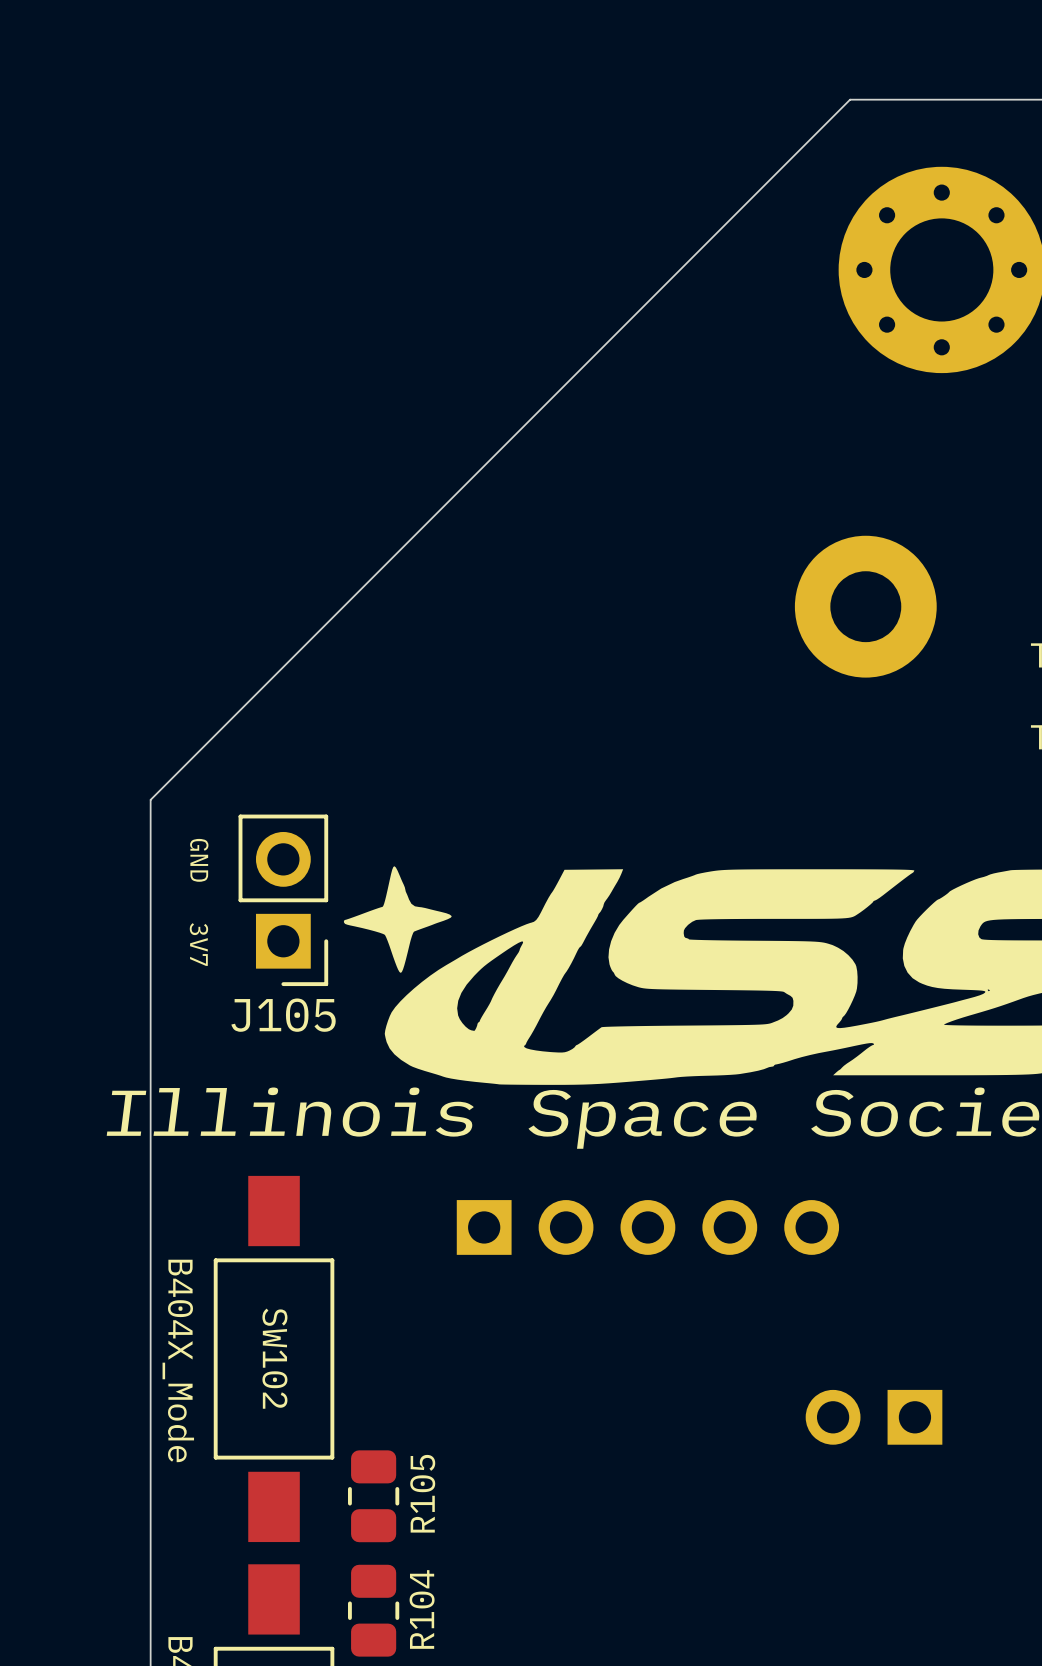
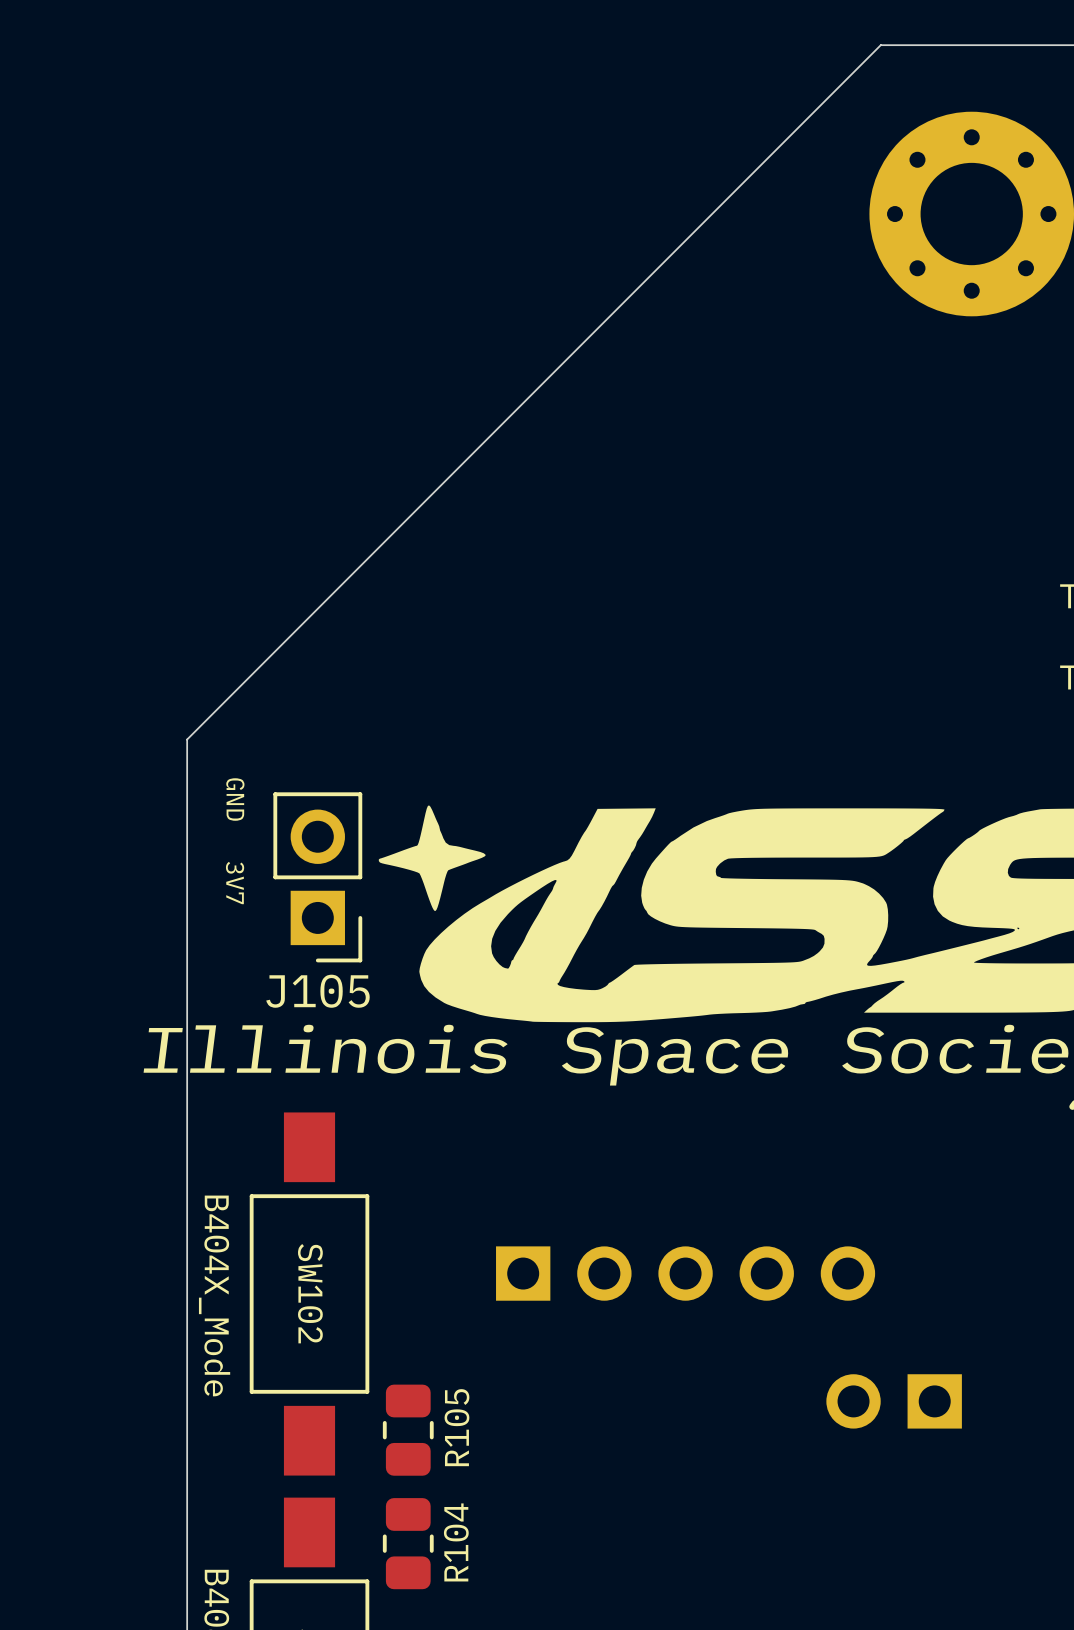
part: (865, 606) -> none
J105 position: (283, 900) -> (317, 877)
part position: (647, 1227) -> (685, 1273)
part position: (874, 1417) -> (894, 1401)

